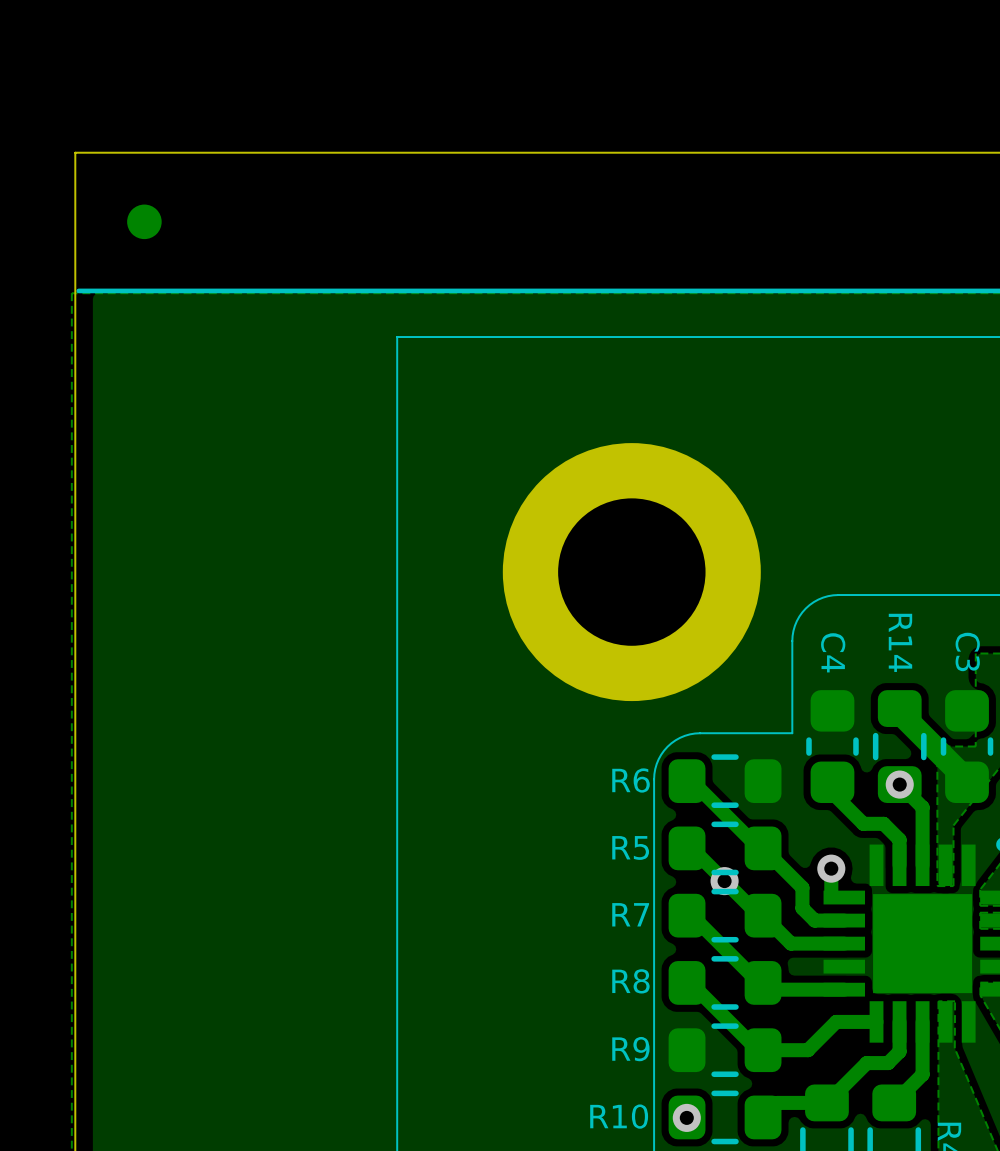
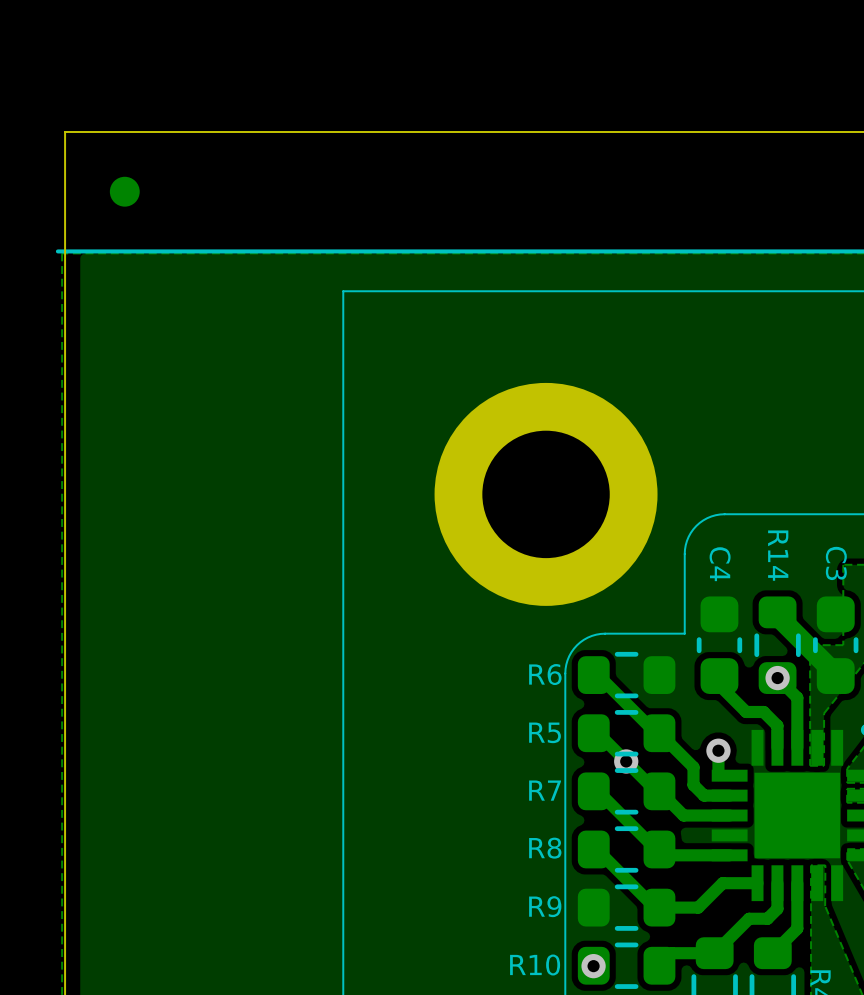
line: none -> (68, 251) (57, 251)

